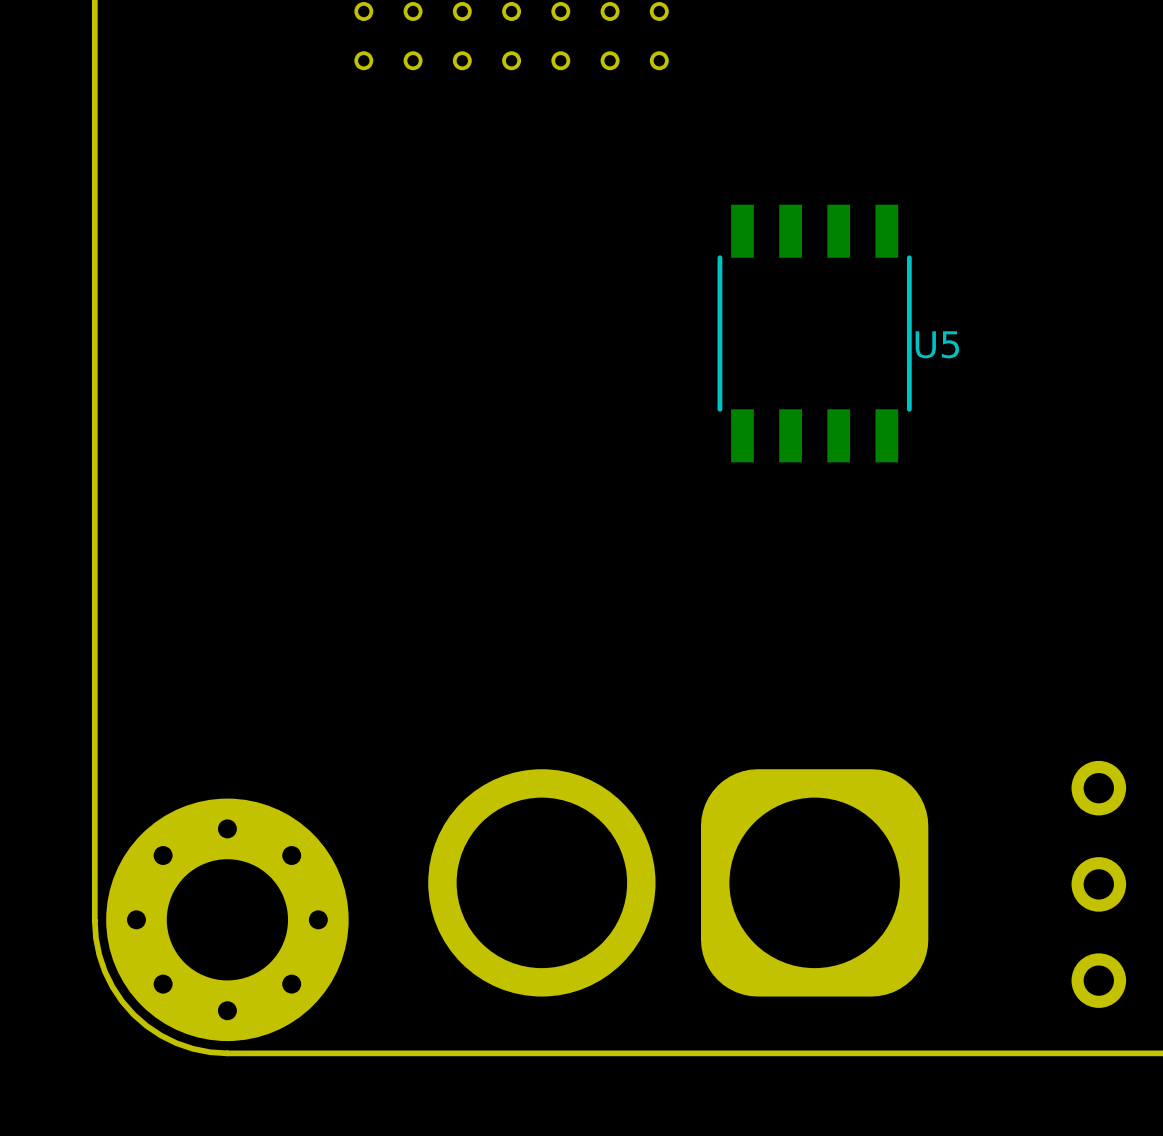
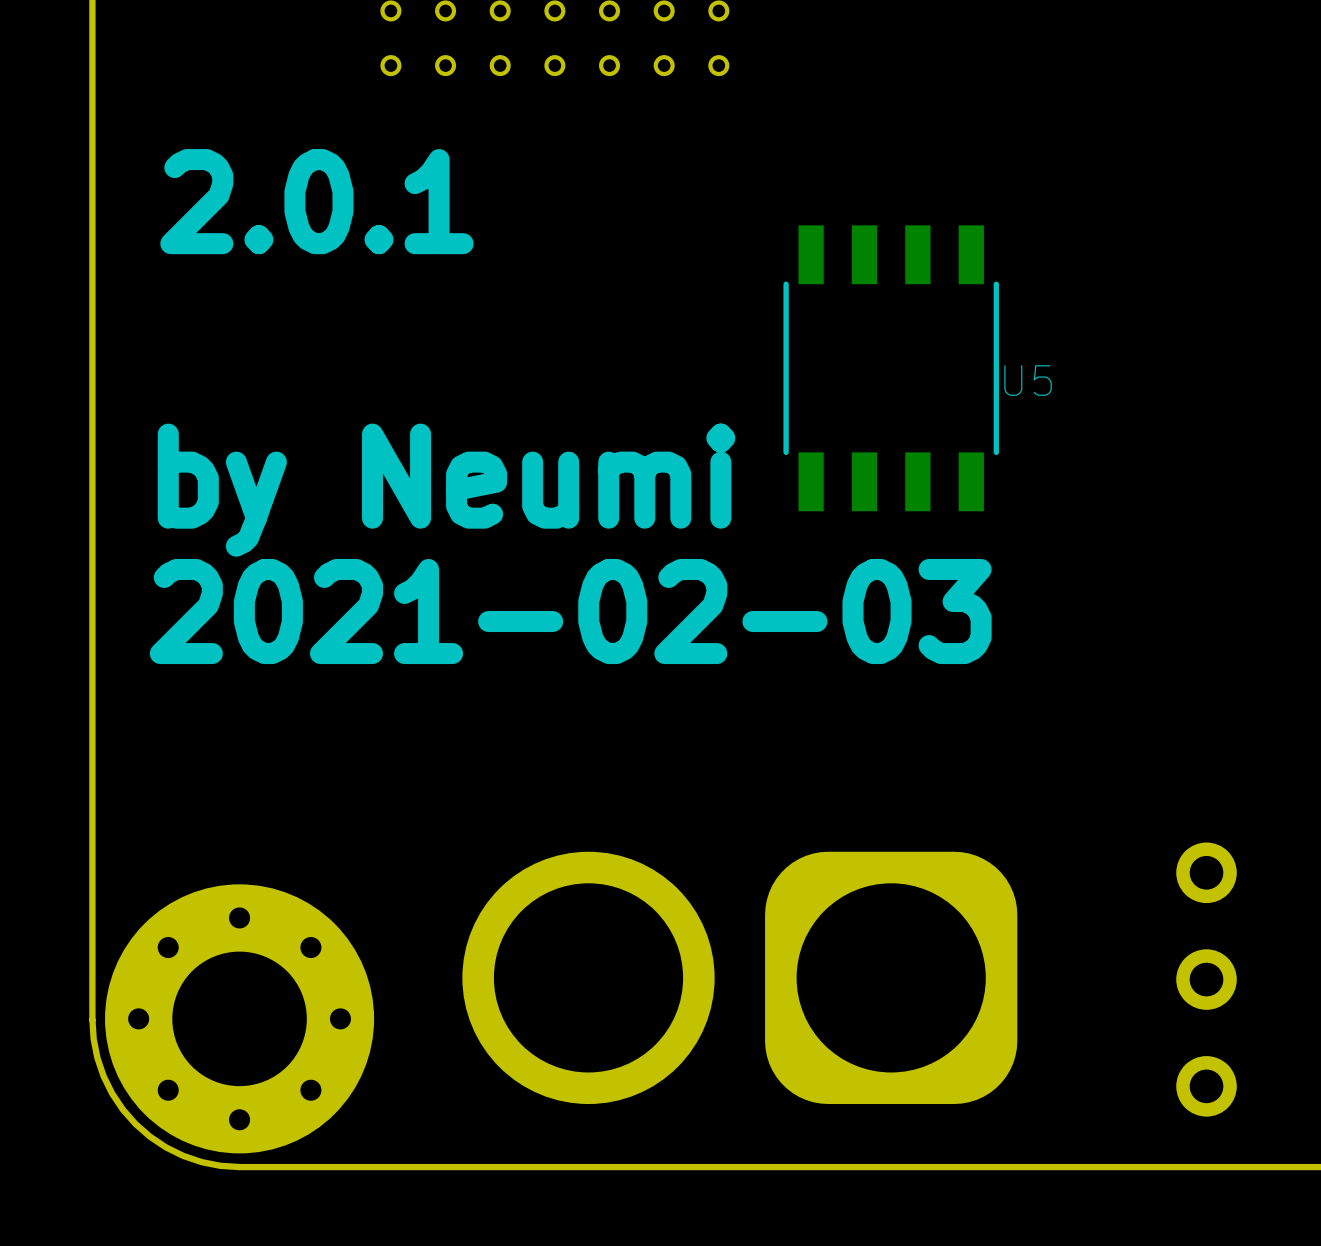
text: none -> 2.0.1 (316, 201)
text: none -> by Neumi (446, 490)
text: none -> 2021-02-03 (570, 611)

